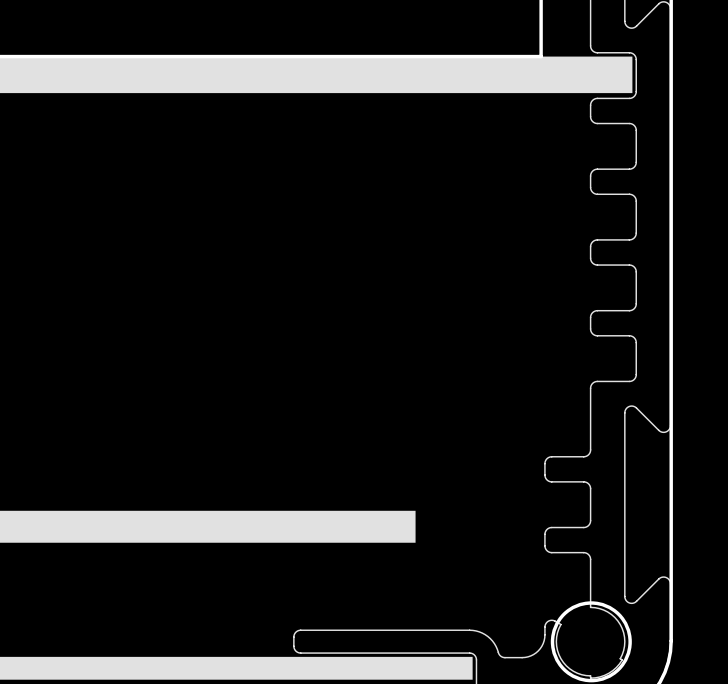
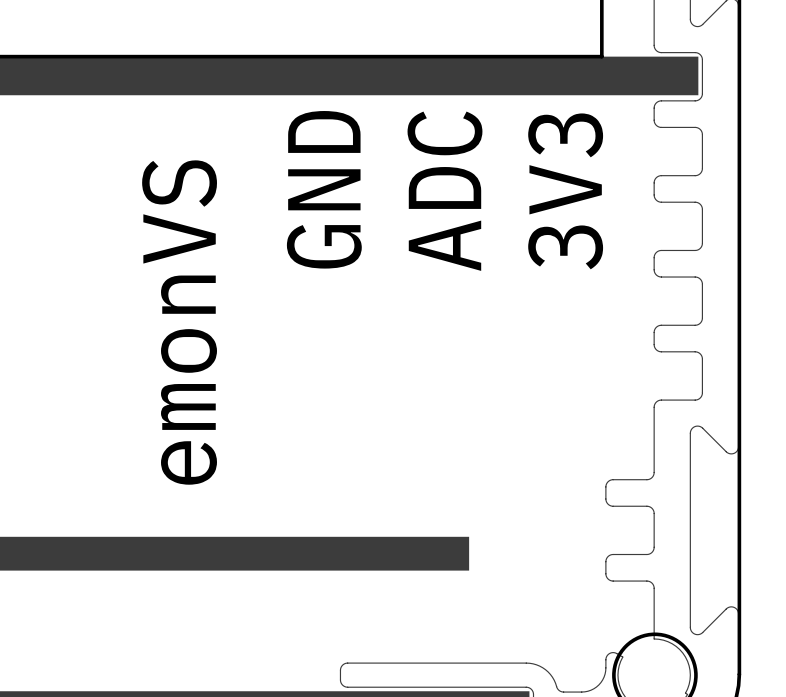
text: none -> GND (324, 189)
text: none -> ADC (444, 191)
text: none -> 3V3 (565, 191)
text: none -> emonVS (179, 322)

